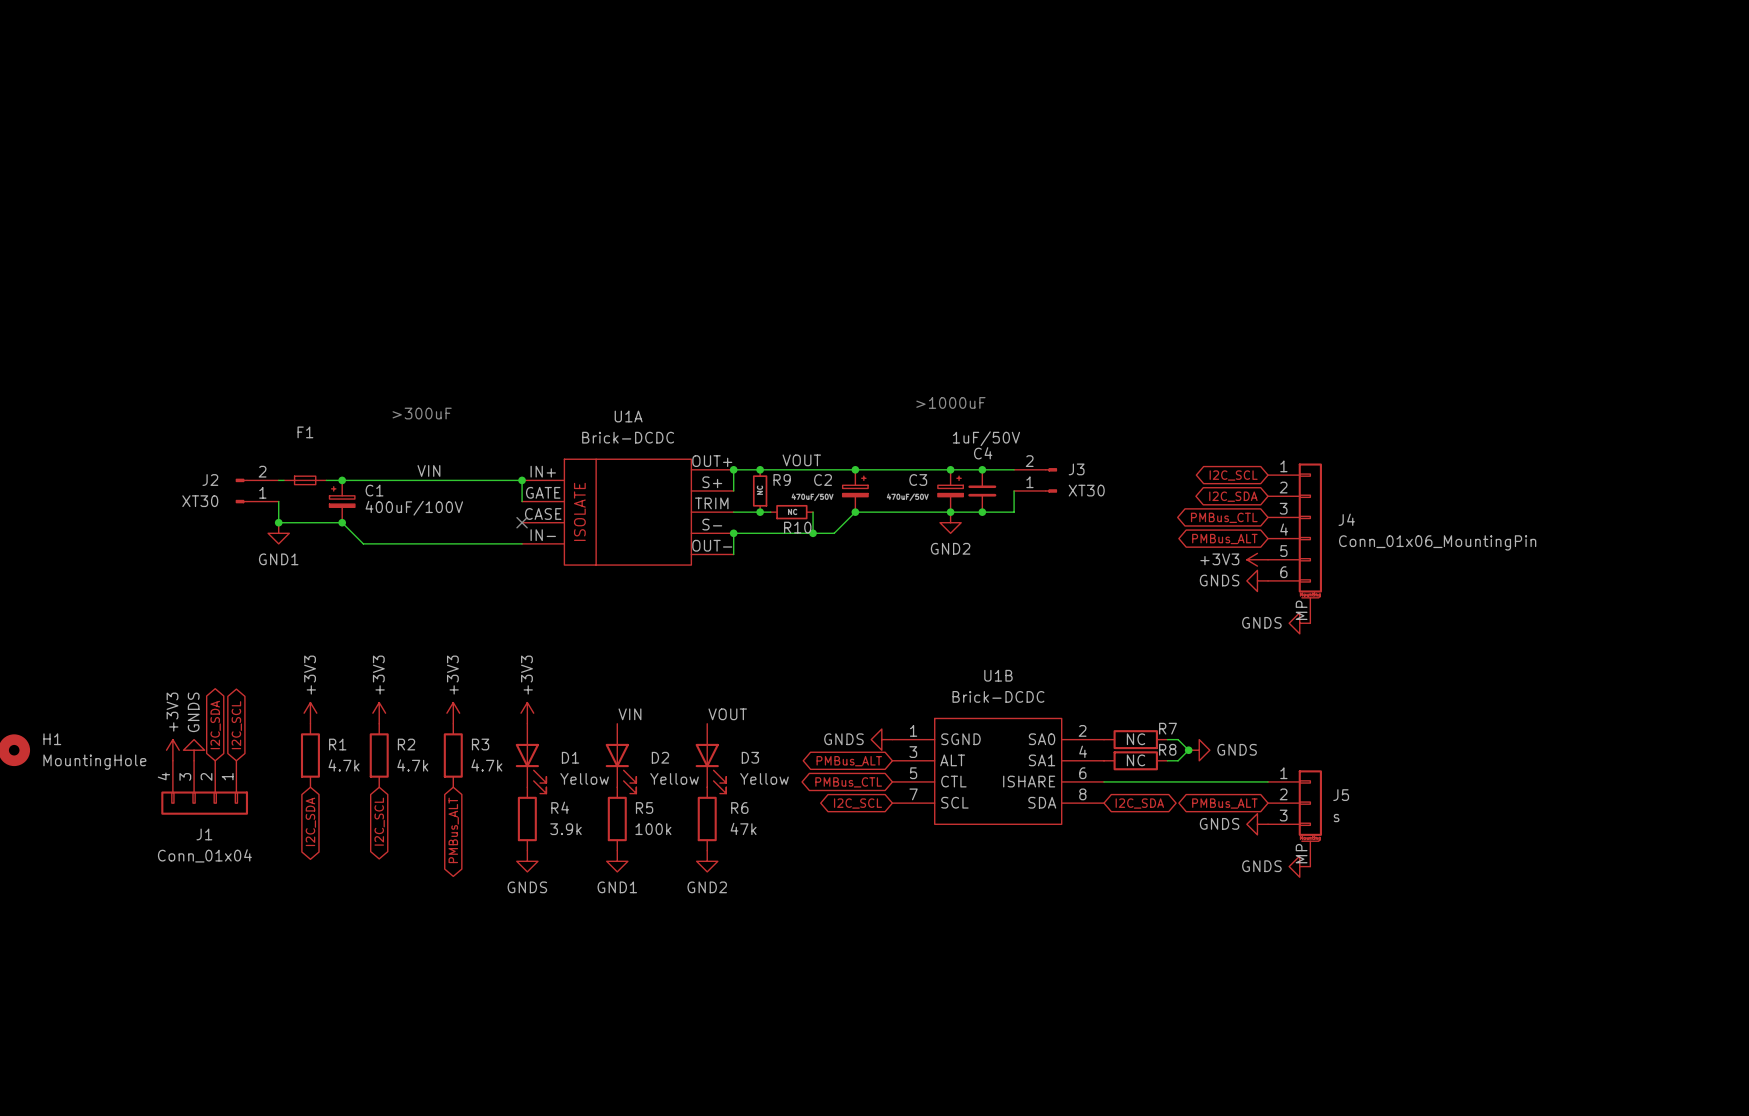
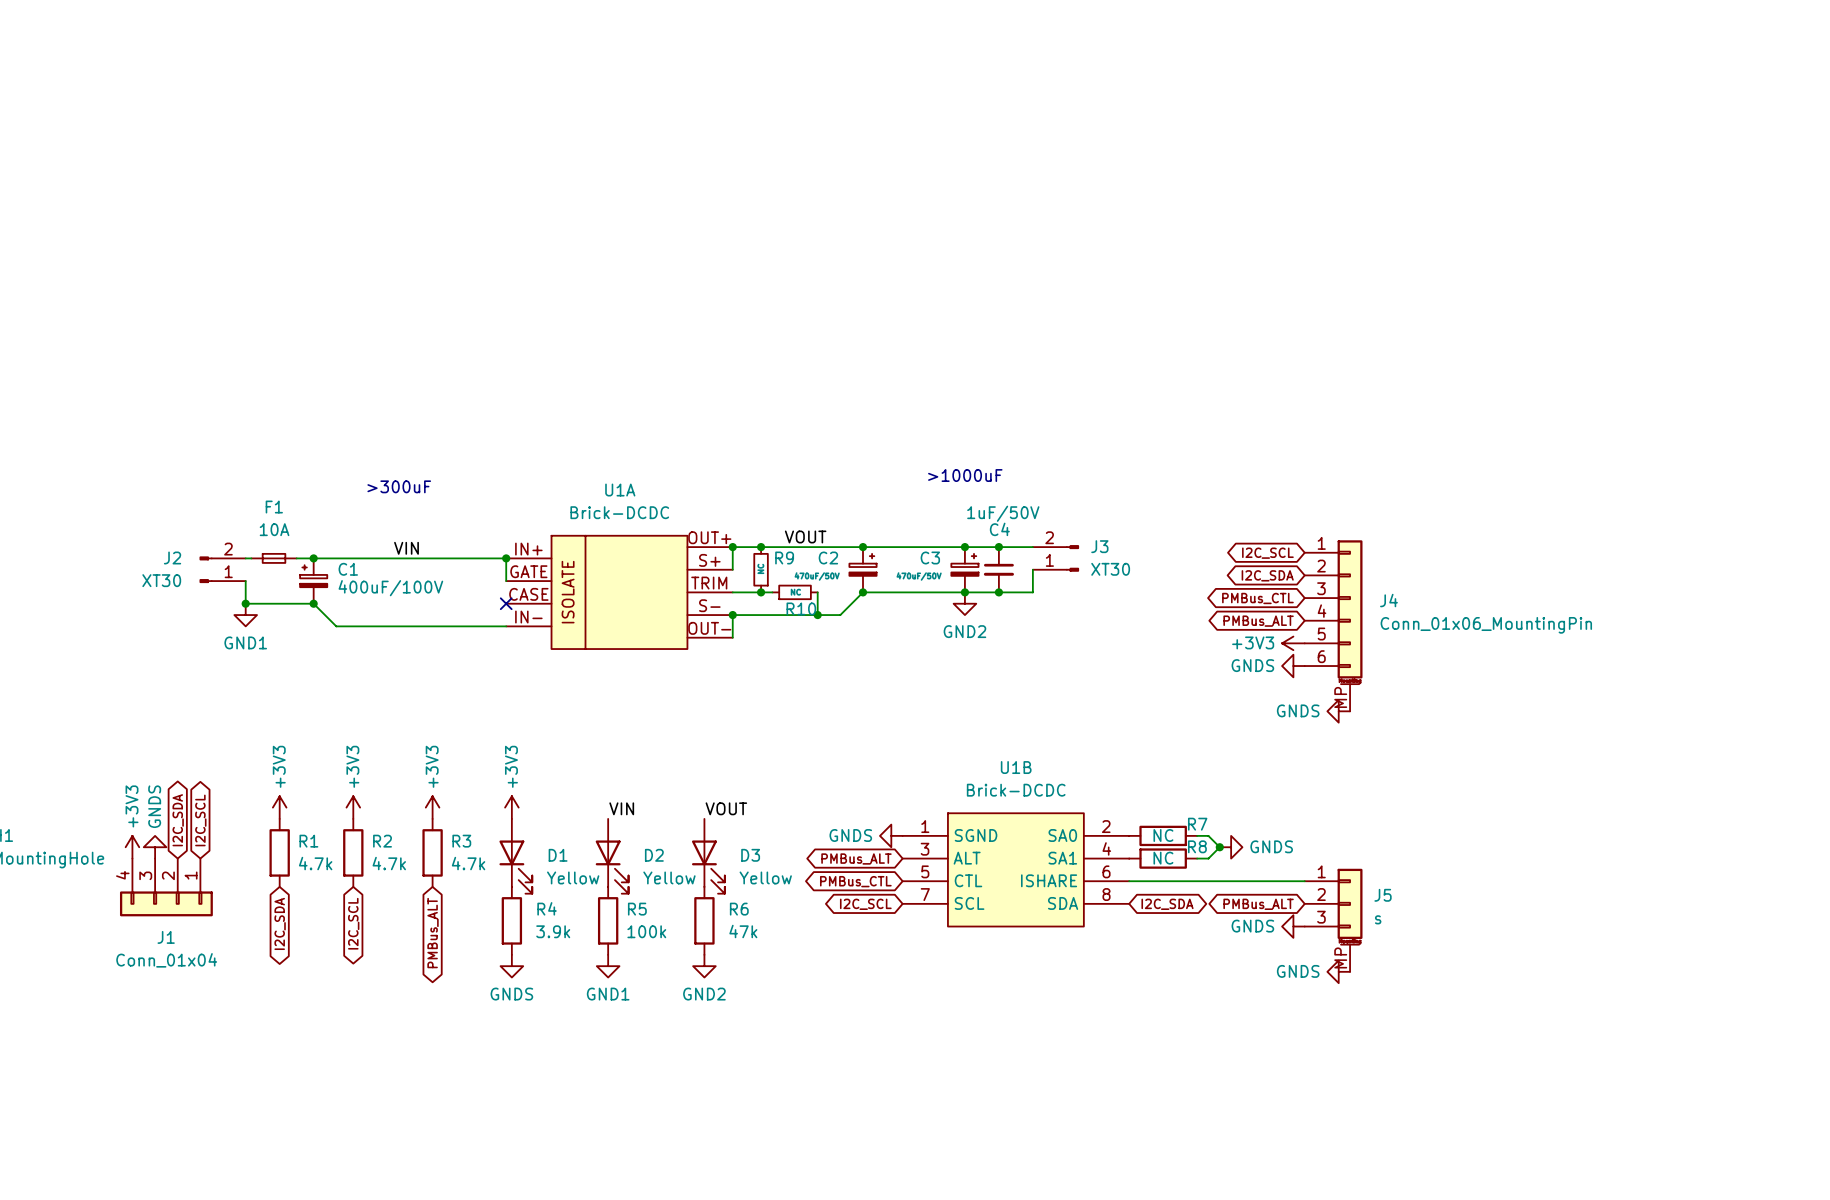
F1 value: none -> 10A (274, 529)

